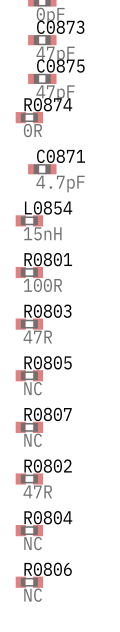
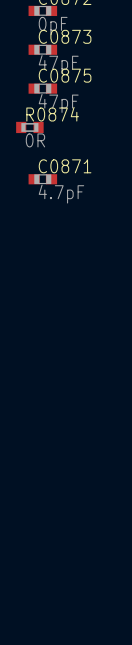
L0854: 15nH (29, 220) -> none
R0801: 100R (29, 272) -> none
R0803: 47R (29, 324) -> none
R0805: NC (29, 375) -> none
R0807: NC (29, 427) -> none
R0802: 47R (29, 478) -> none
R0804: NC (29, 530) -> none
R0806: NC (29, 582) -> none

